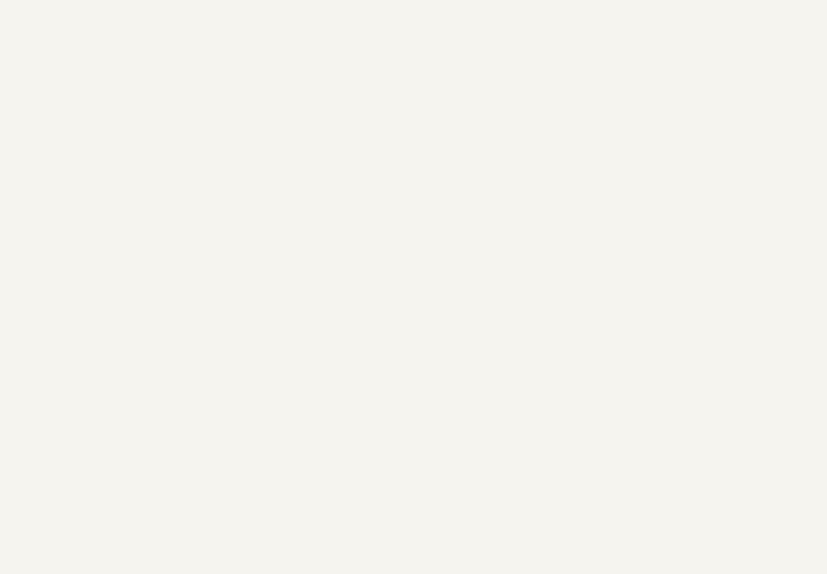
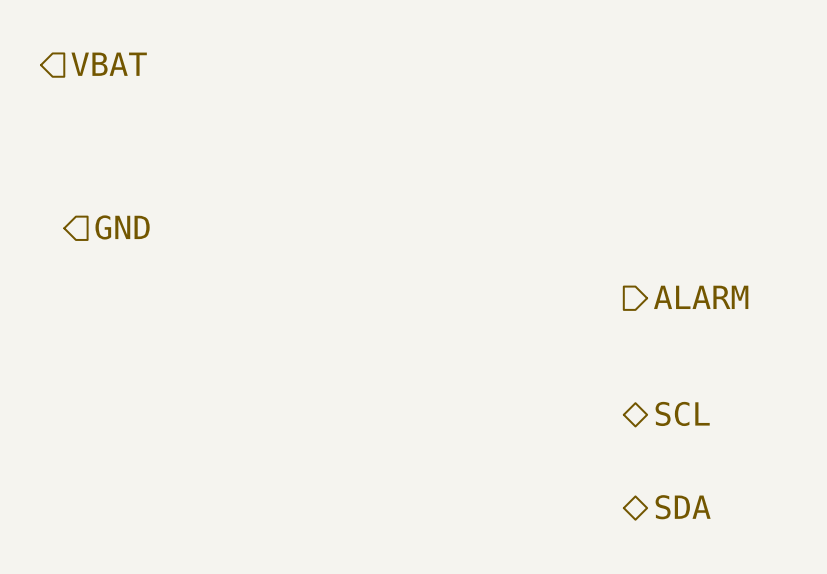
hierarchical label: none -> VBAT (109, 64)
hierarchical label: none -> GND (122, 227)
hierarchical label: none -> ALARM (701, 297)
hierarchical label: none -> SCL (682, 413)
hierarchical label: none -> SDA (683, 507)

